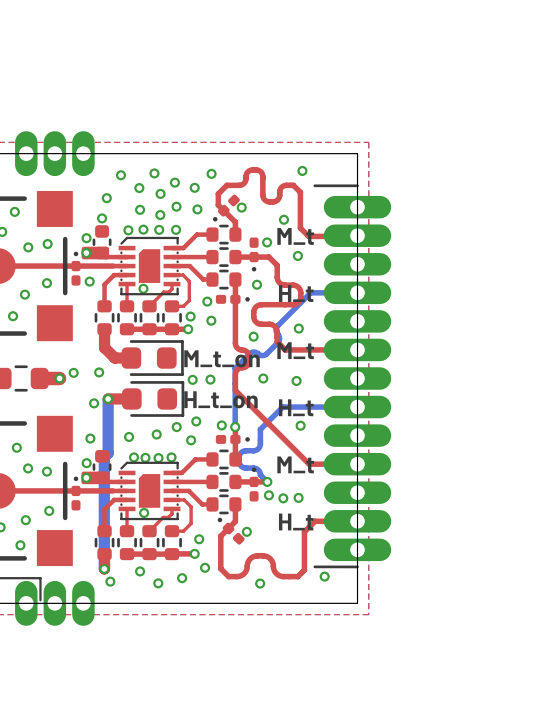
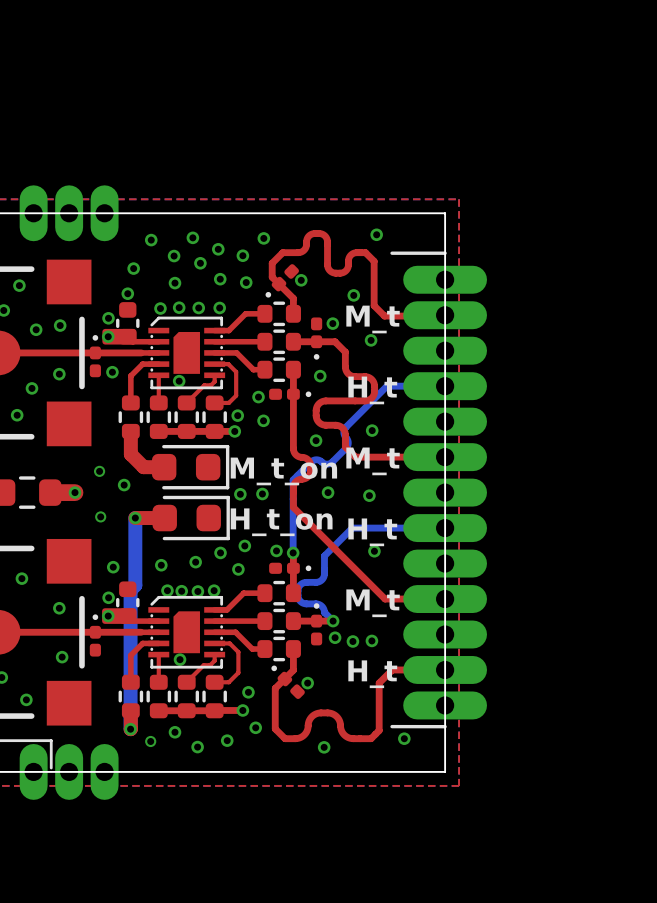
via: (160, 215) -> none
via: none -> (99, 471)
via: (73, 372) -> none
via: none -> (100, 516)
via: (94, 403) -> none
via: (28, 468) -> none
via: (25, 520) -> none
via: none -> (150, 741)
via: (110, 581) -> none

